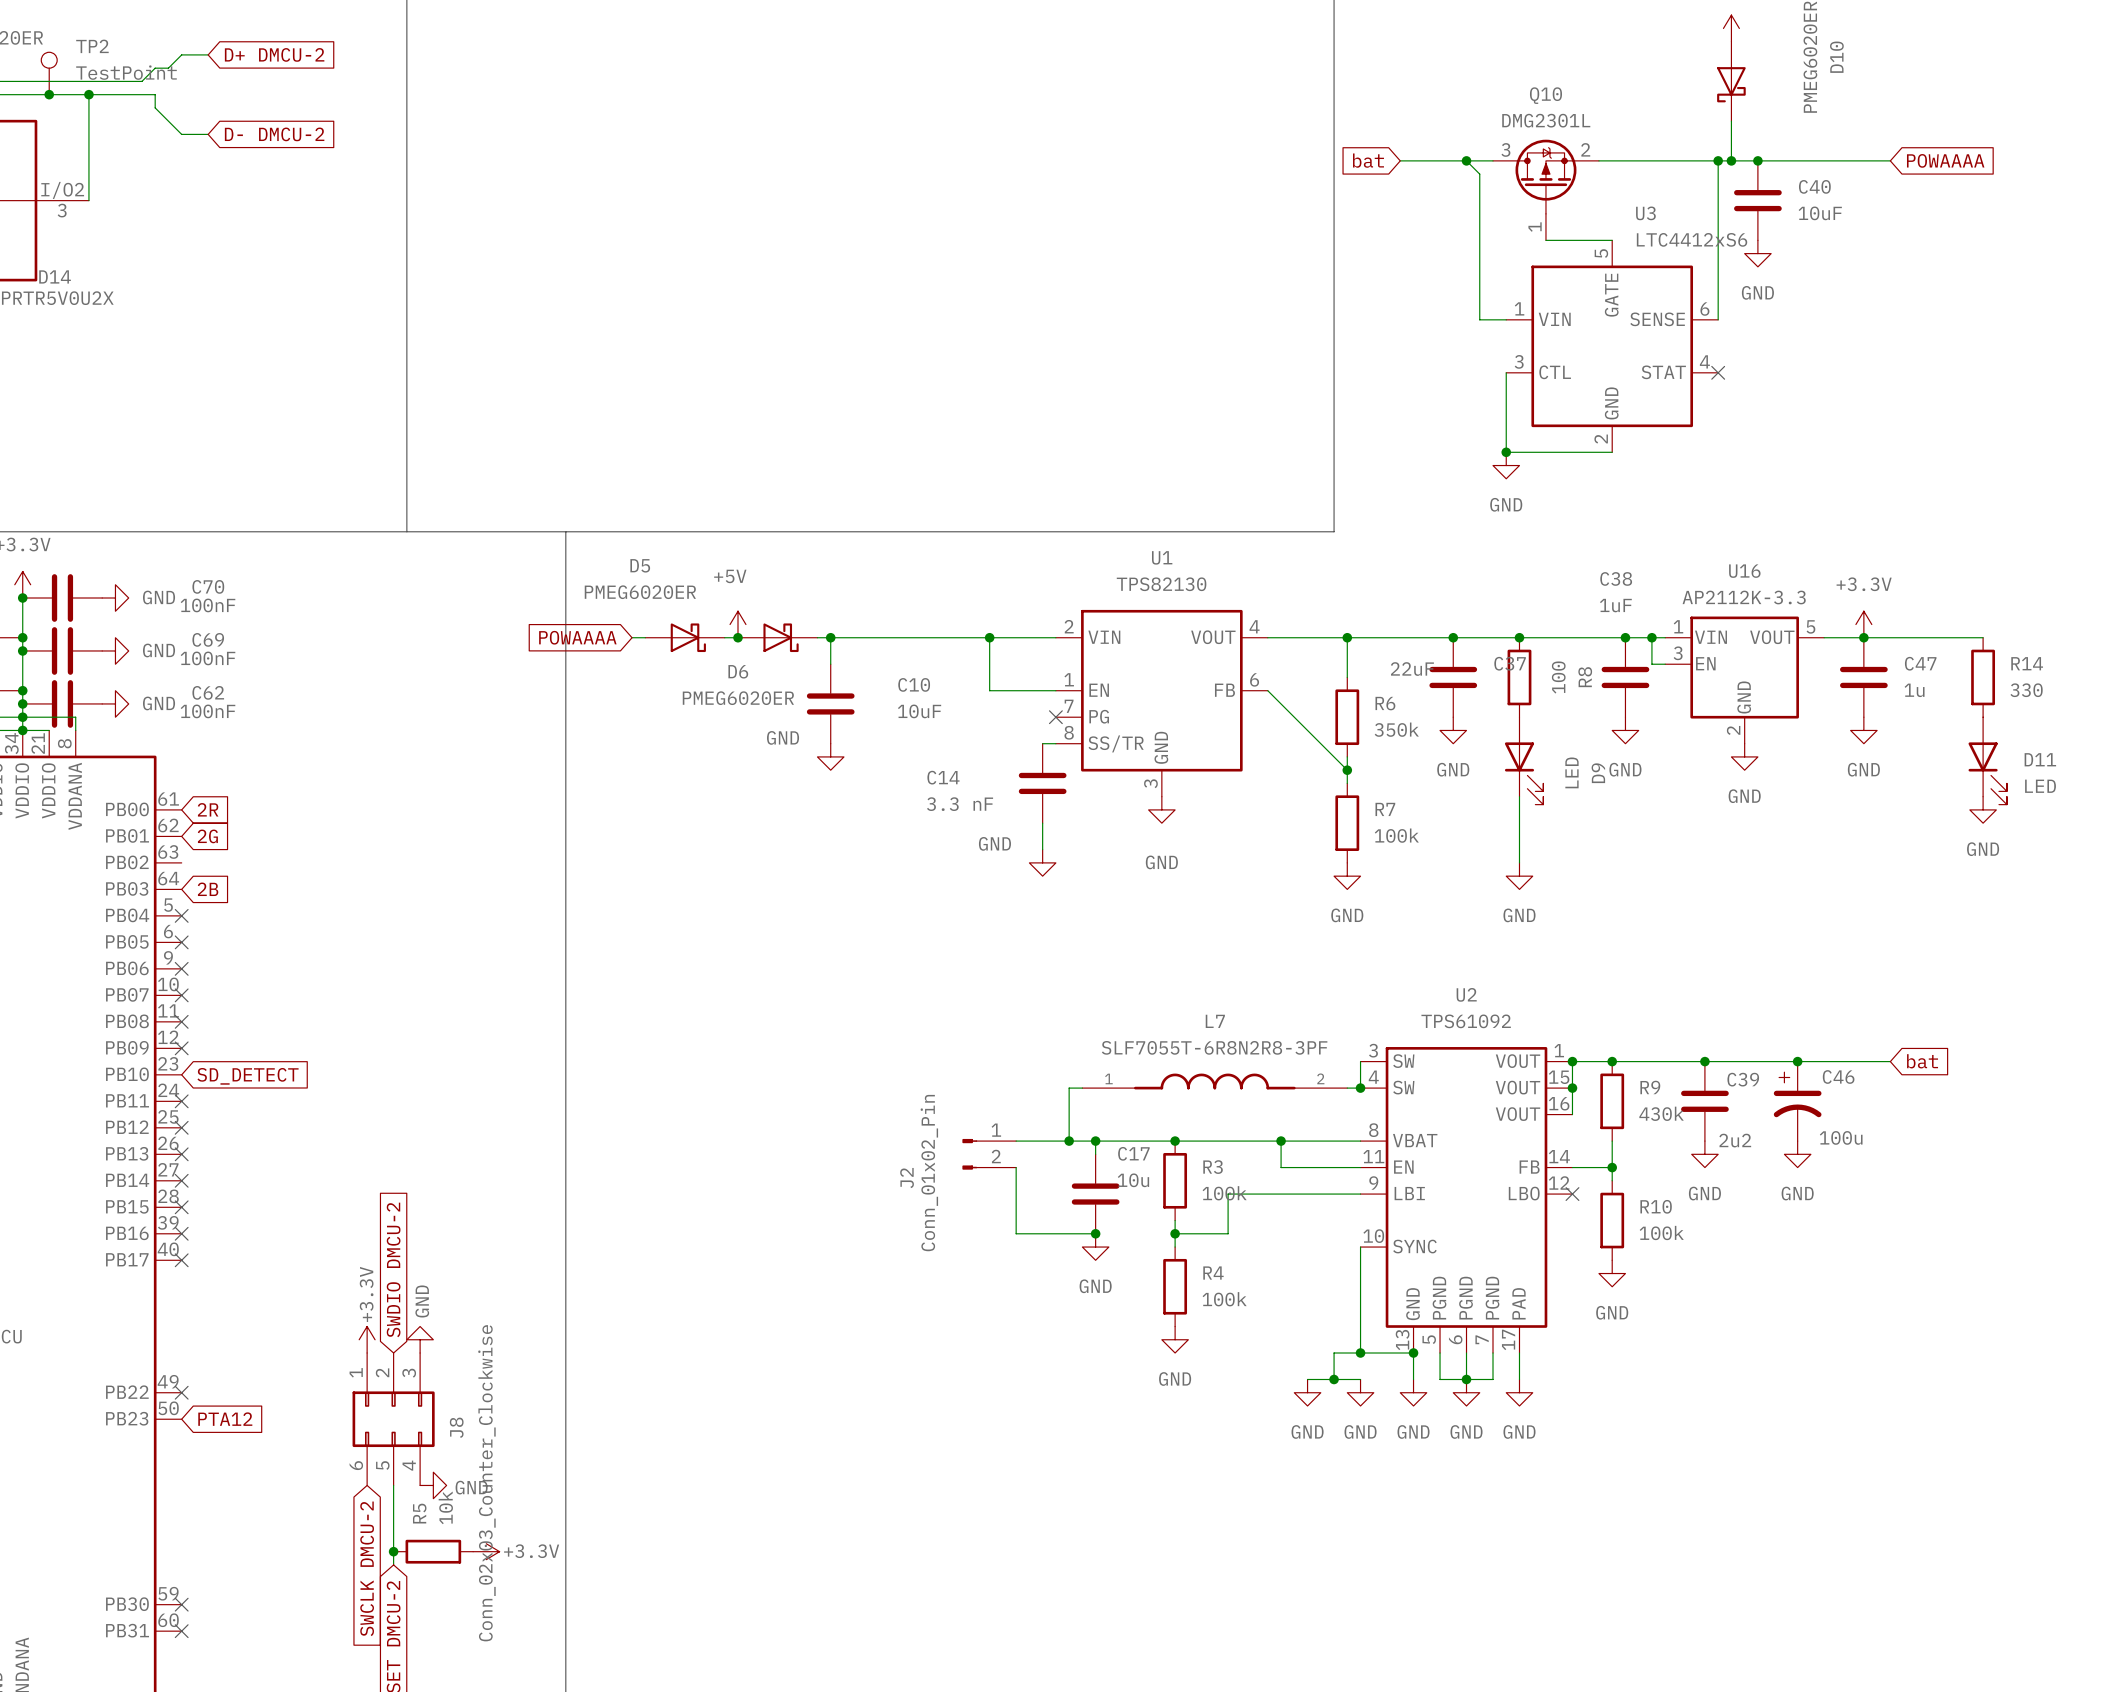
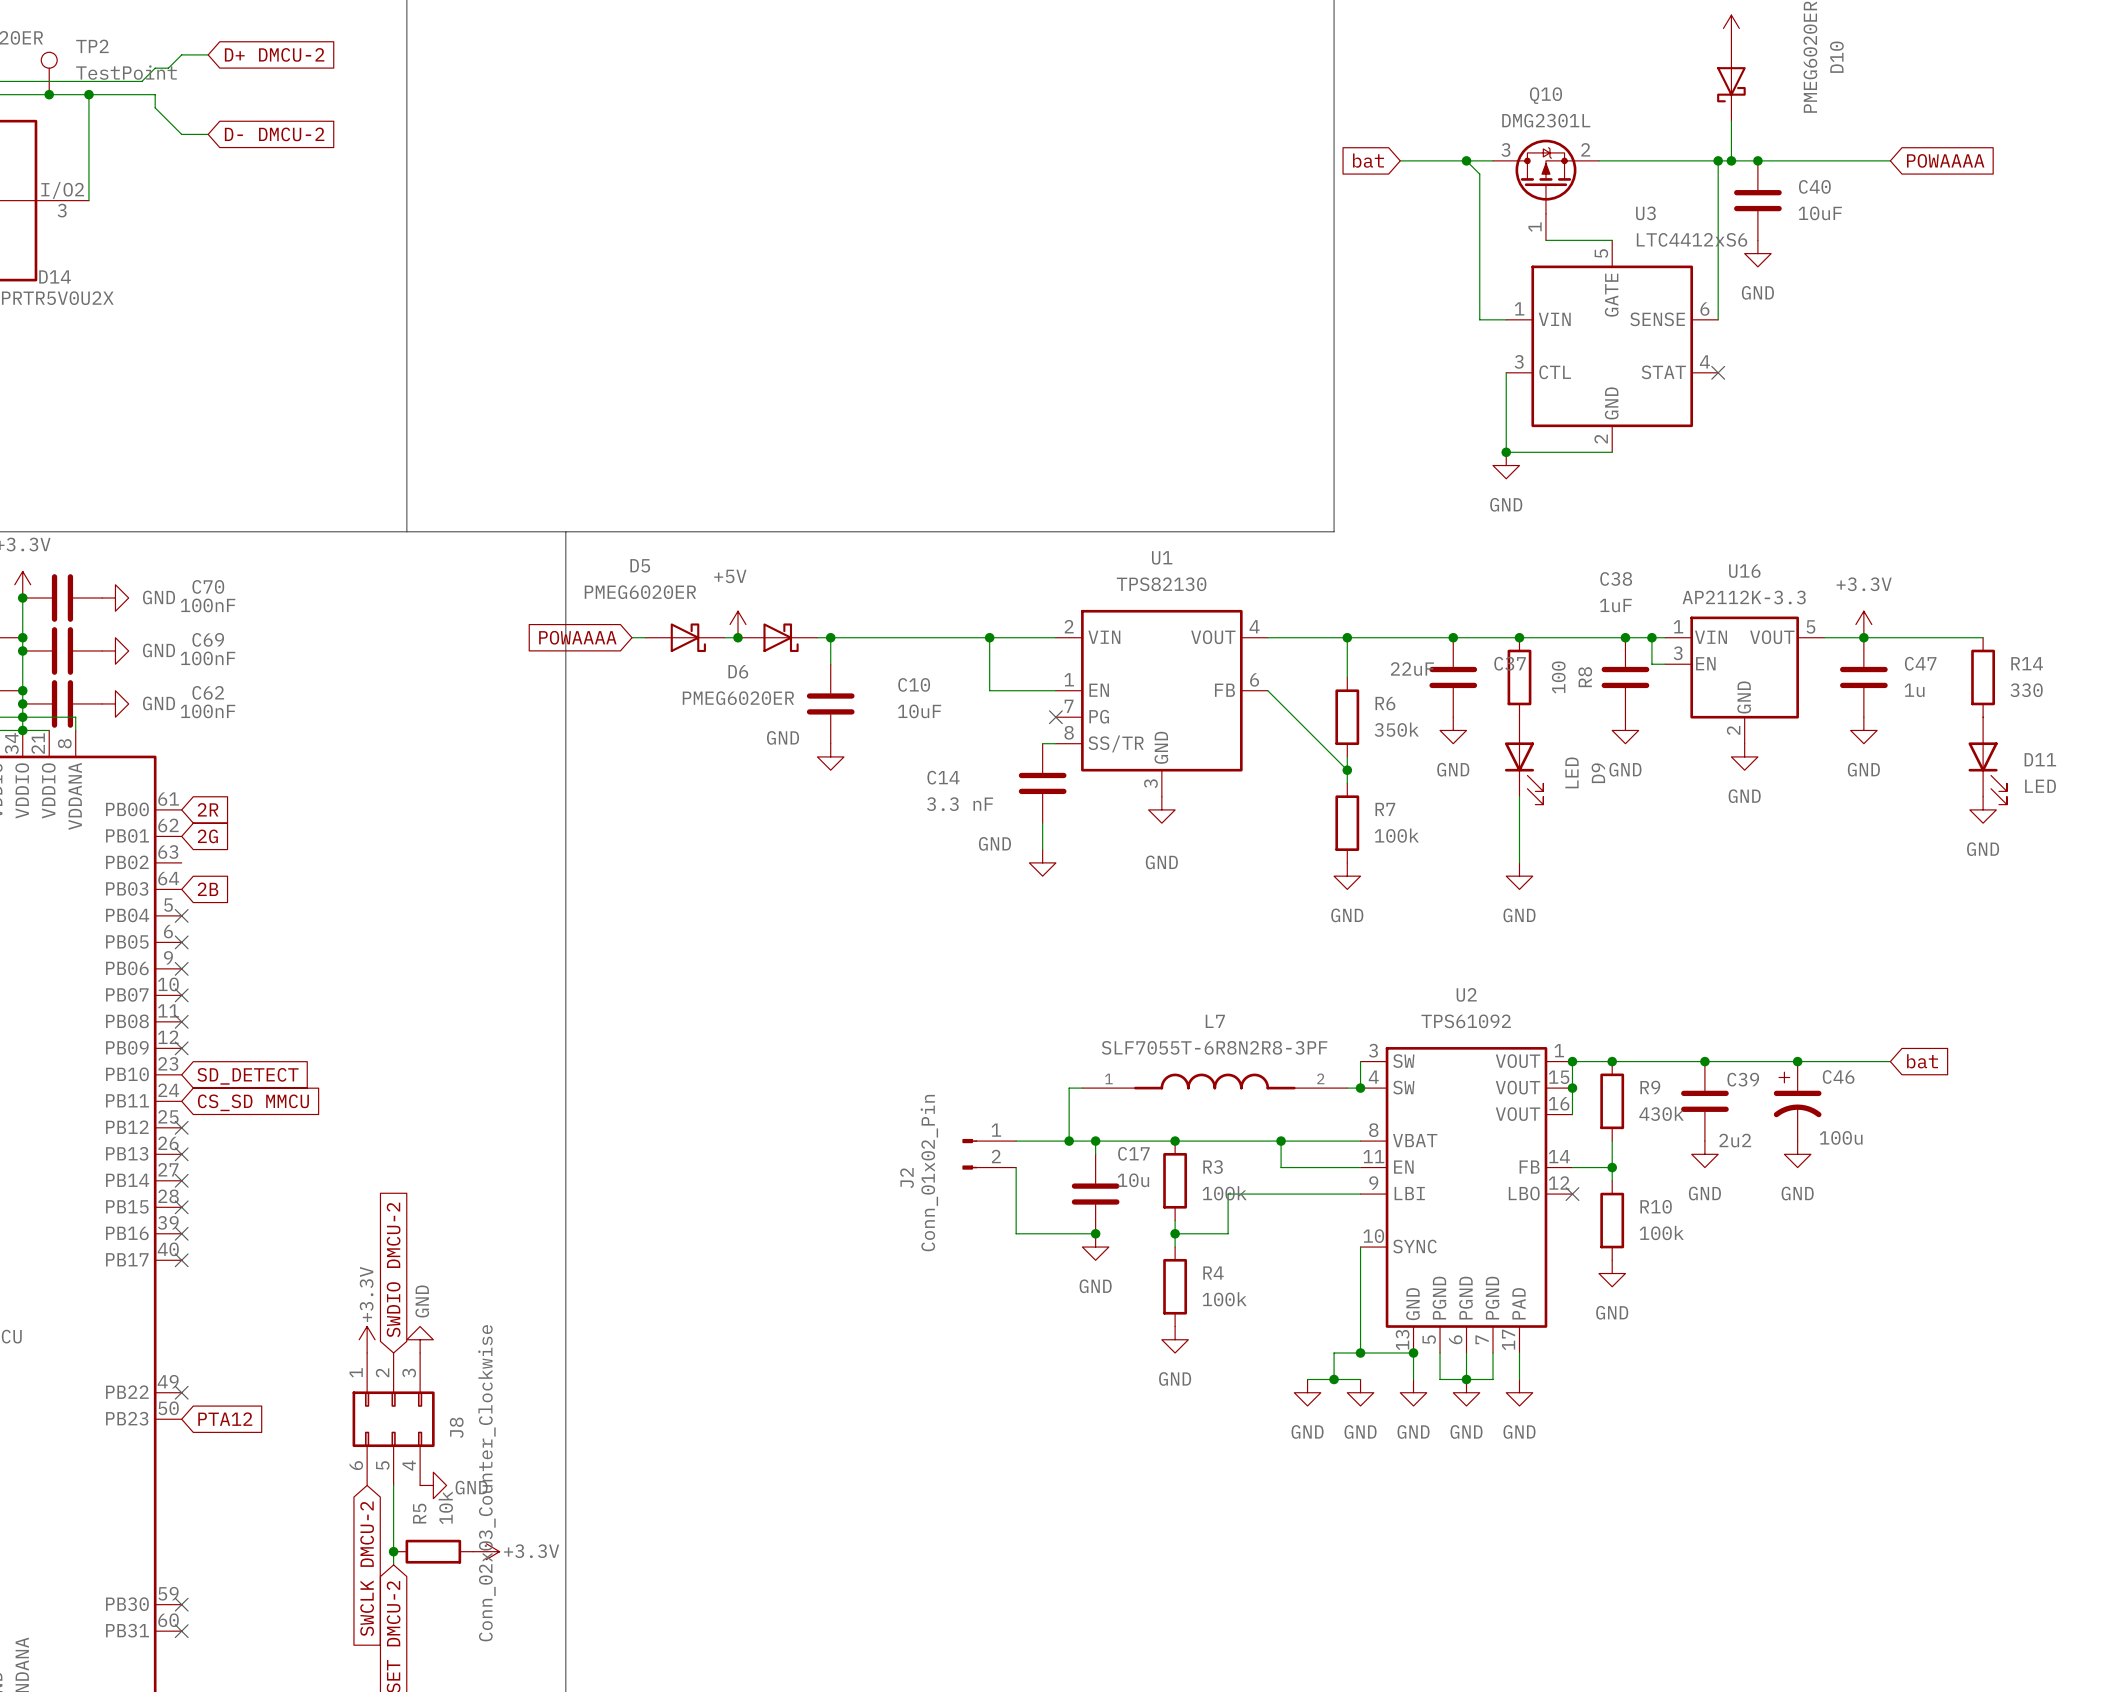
no-connect mark: (181, 1101) -> none
global label: none -> CS_SD MMCU (253, 1102)

